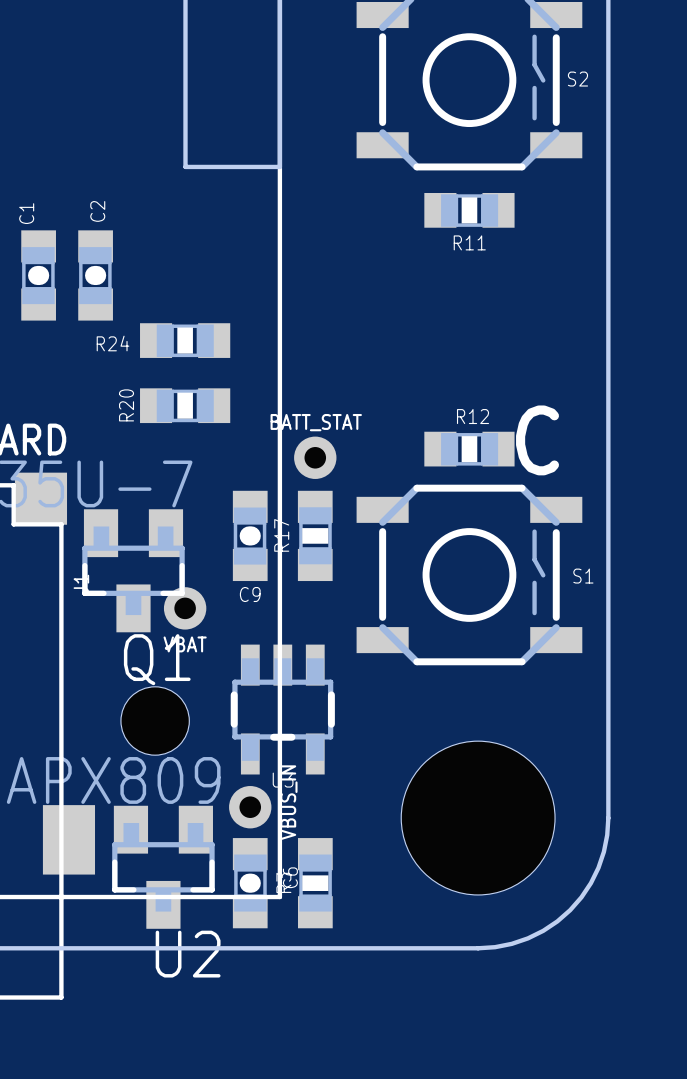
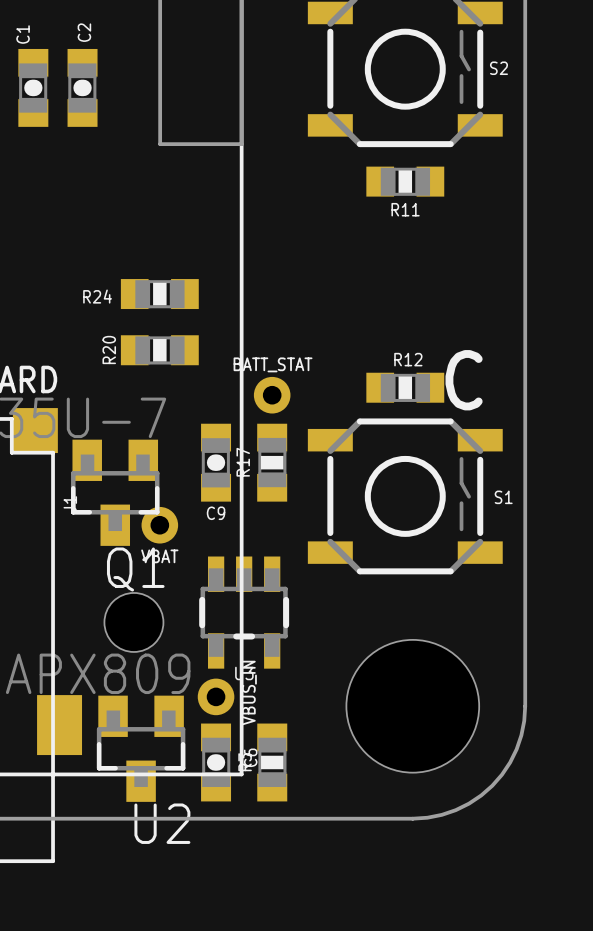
C1 position: (38, 275) -> (33, 87)
C2 position: (95, 275) -> (82, 87)

